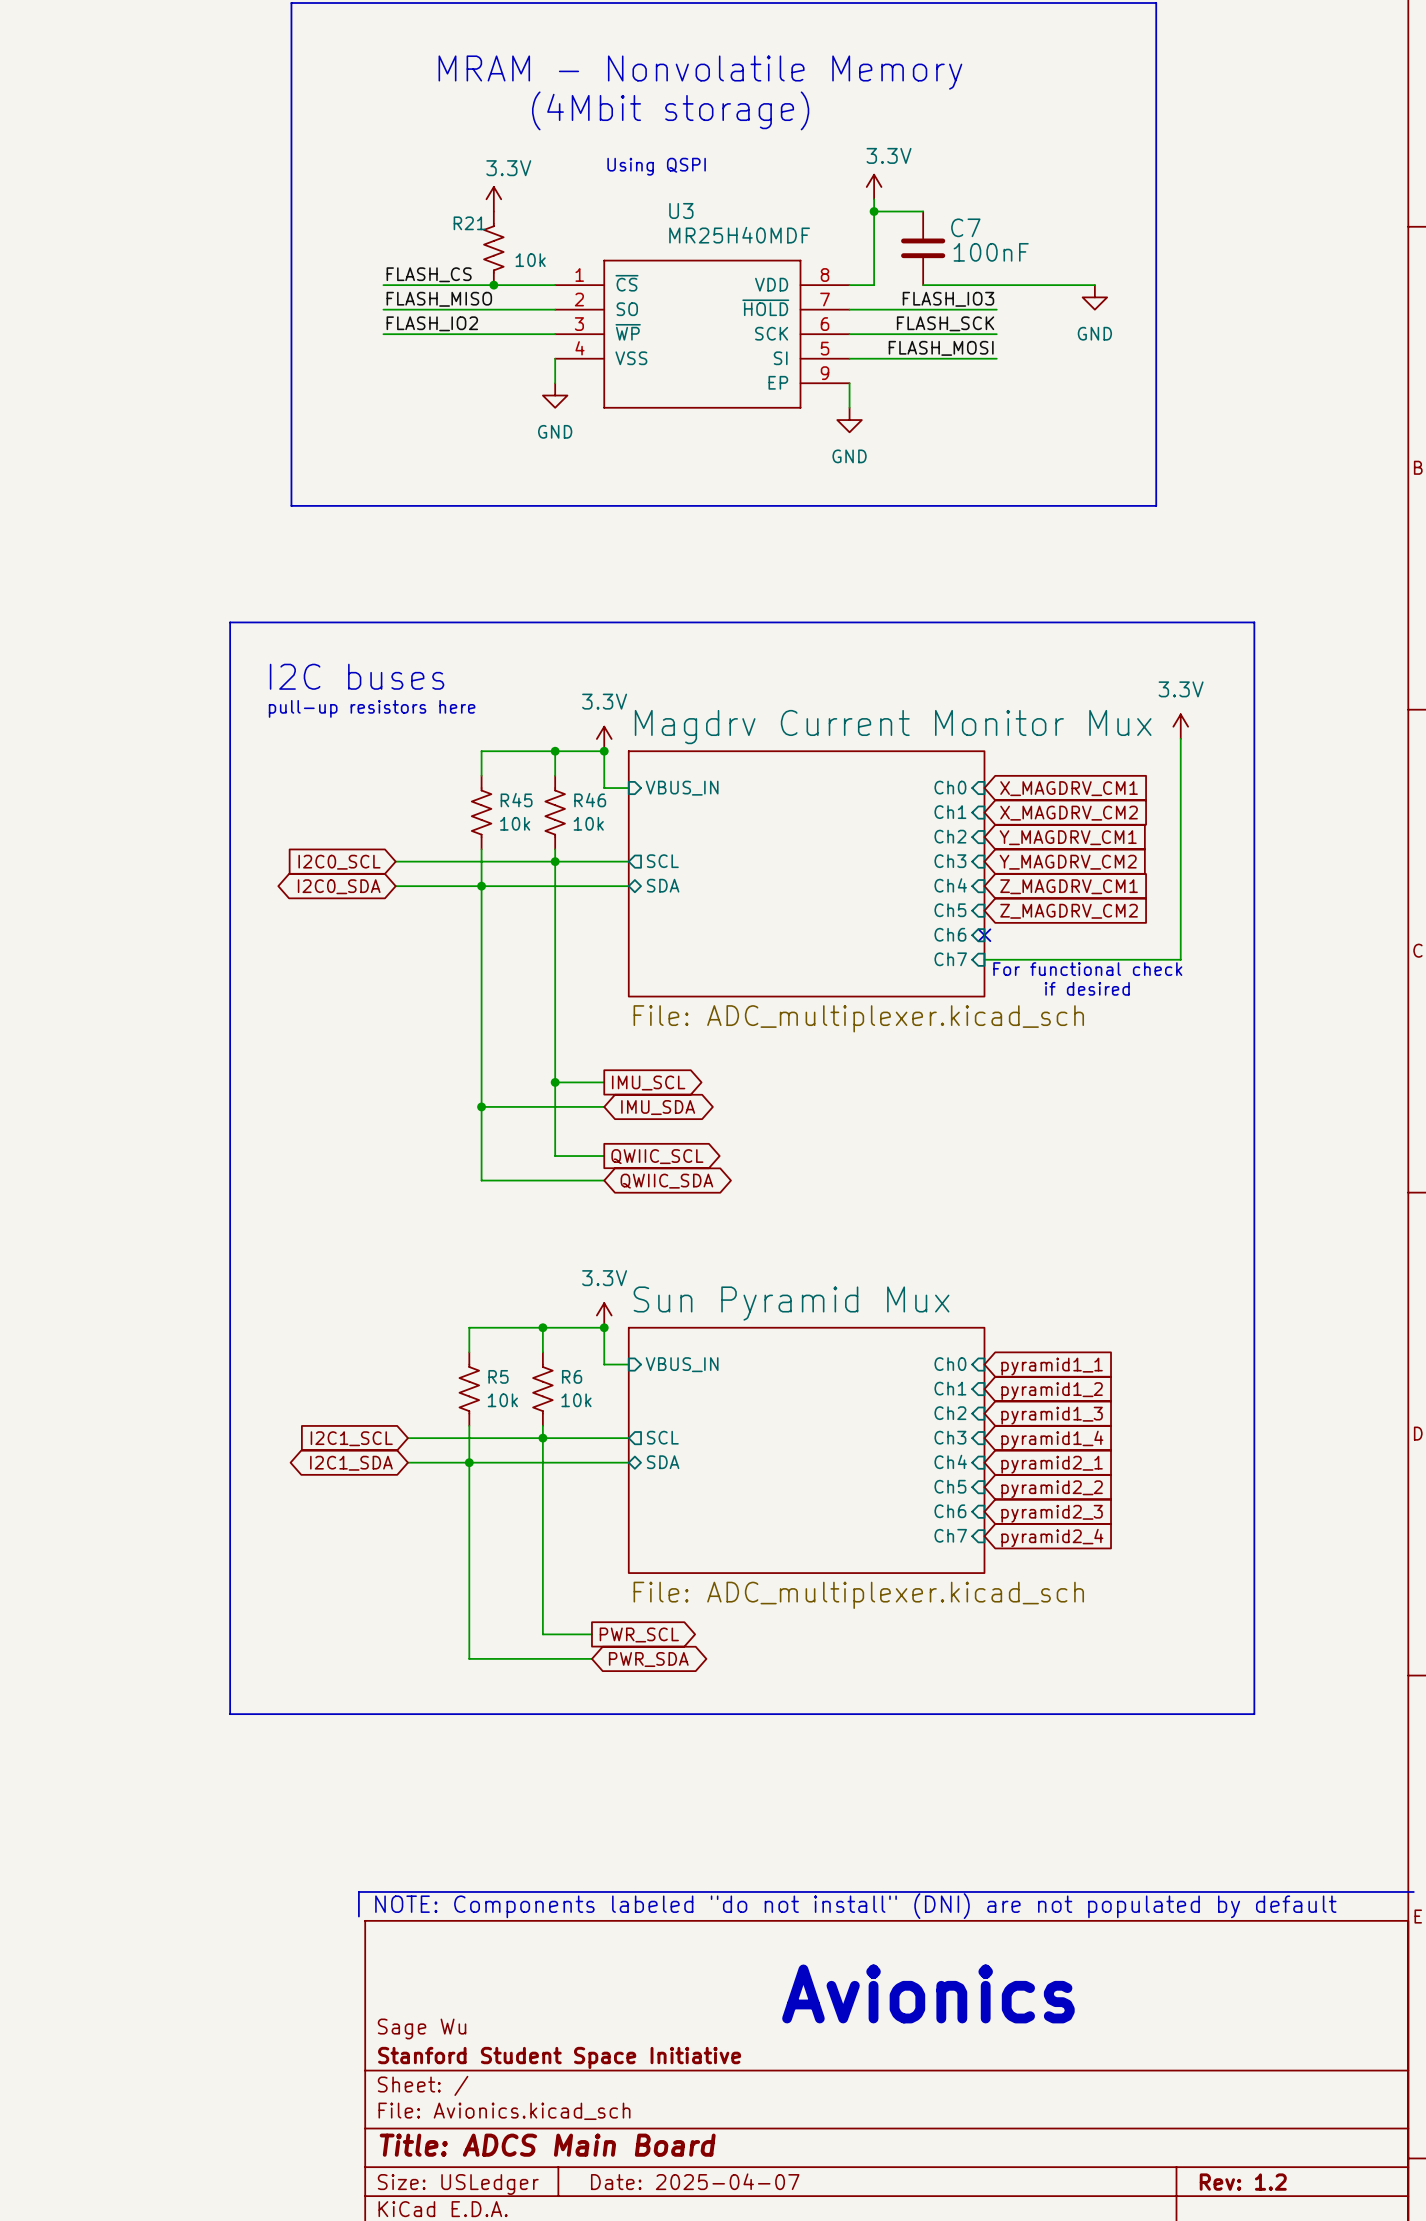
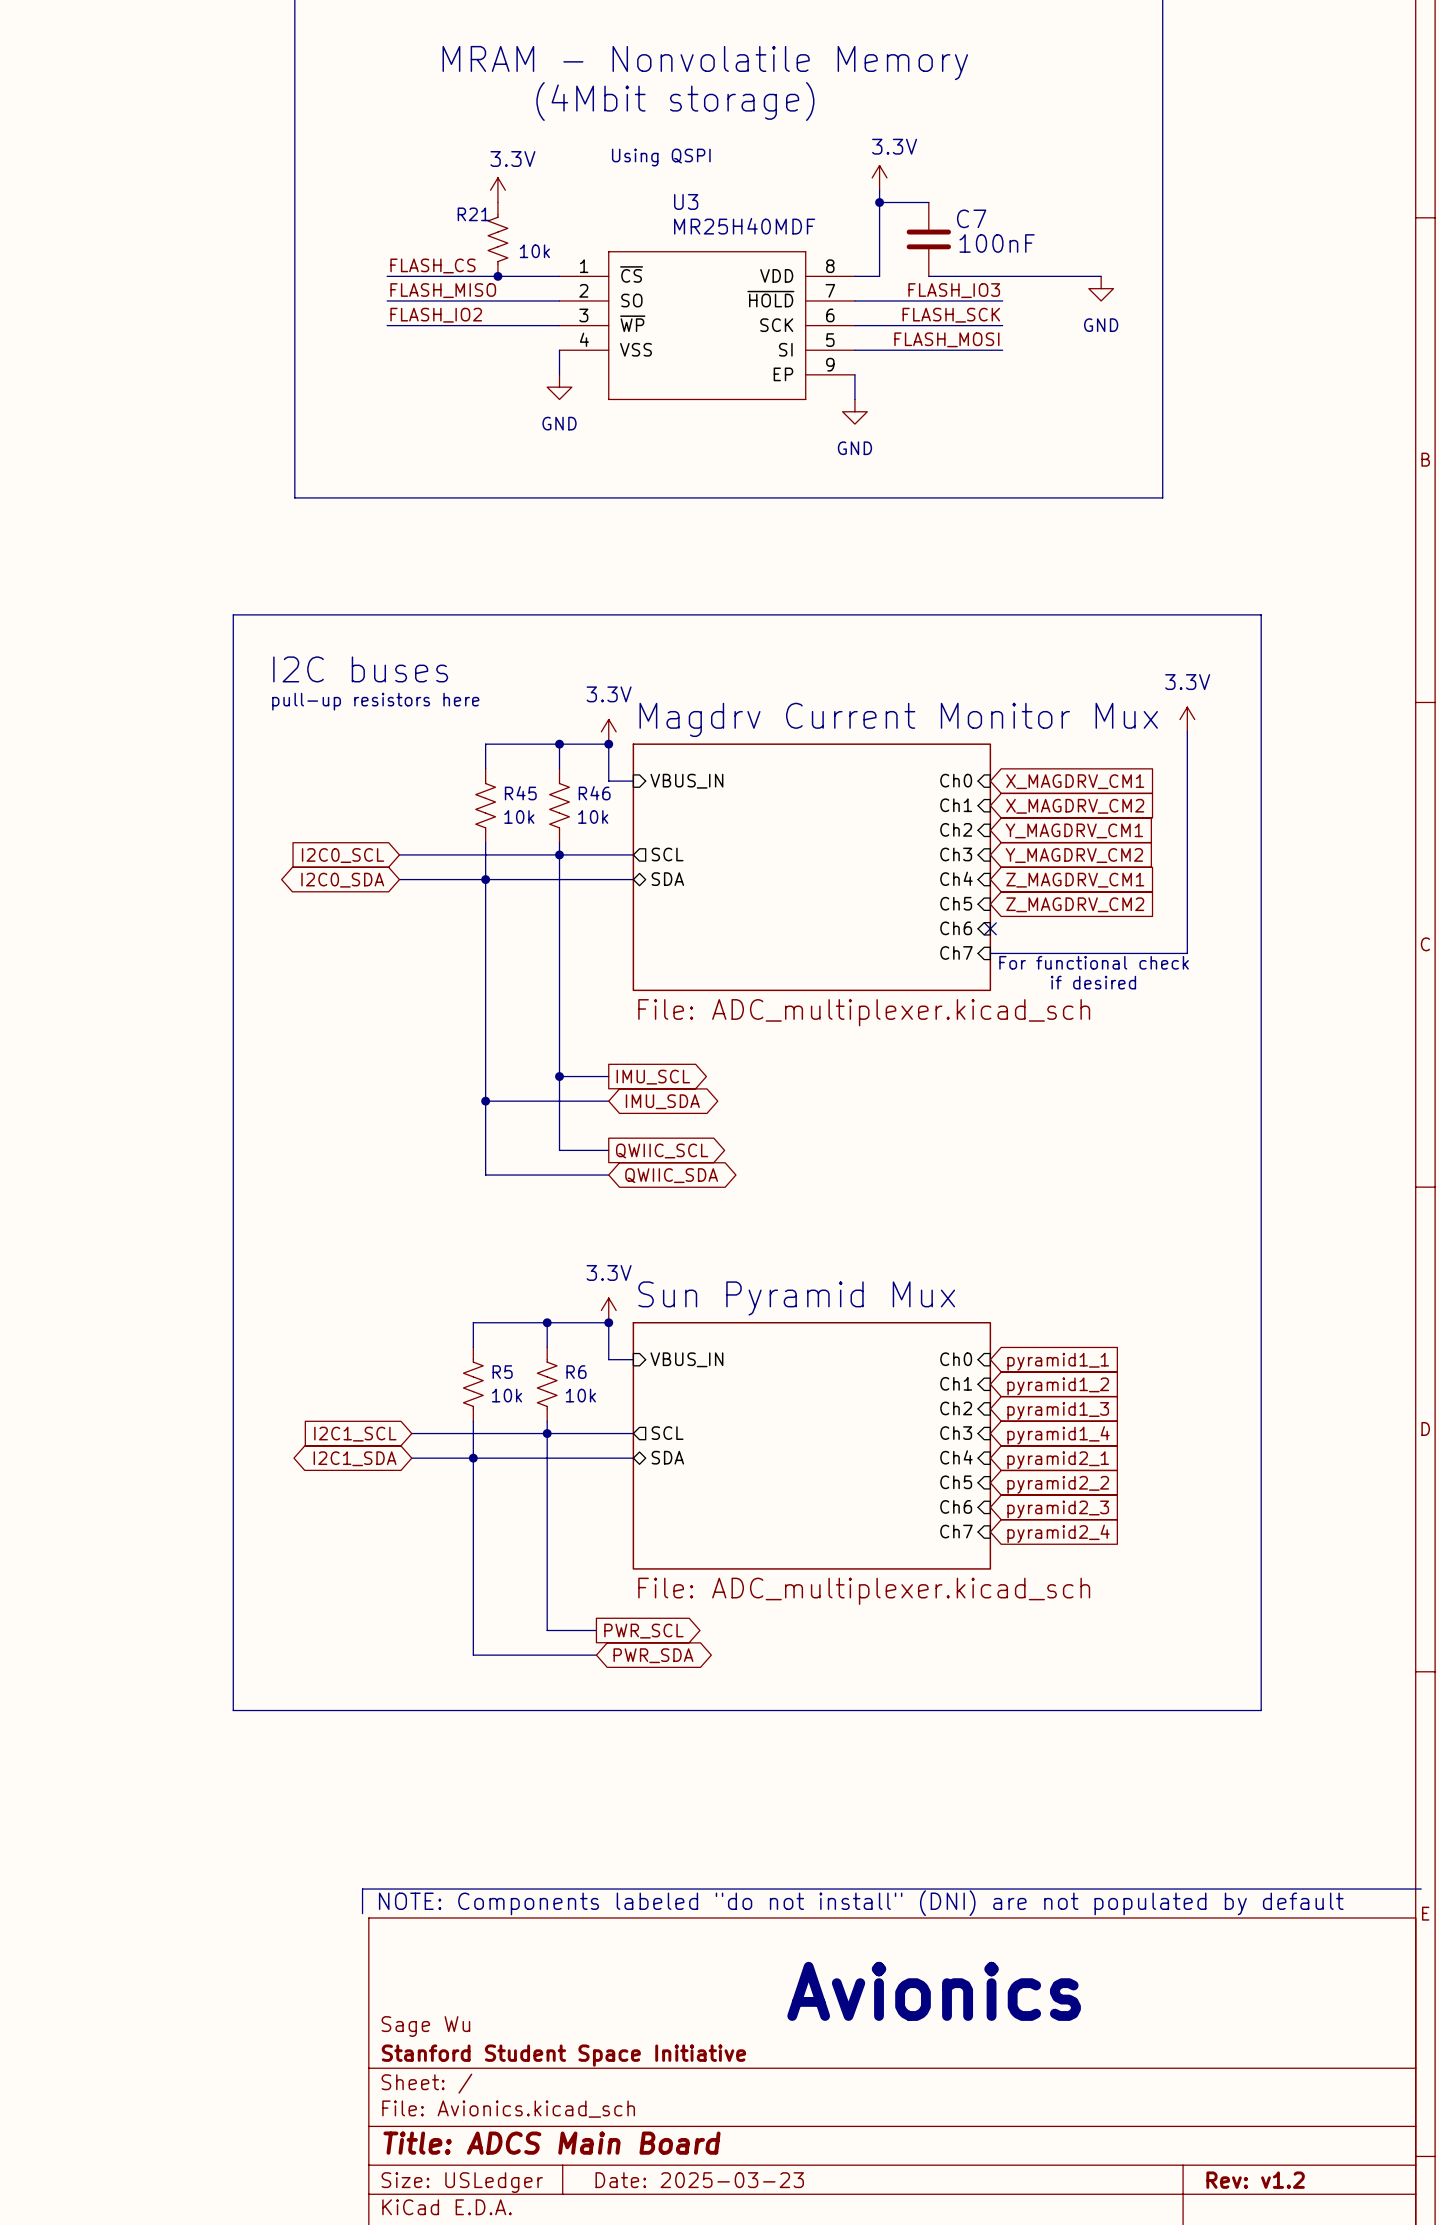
title block: Date: 2025-04-07 (695, 2181) -> Date: 2025-03-23 (699, 2180)
title block: Rev: 1.2 (1243, 2182) -> Rev: v1.2 (1255, 2180)

